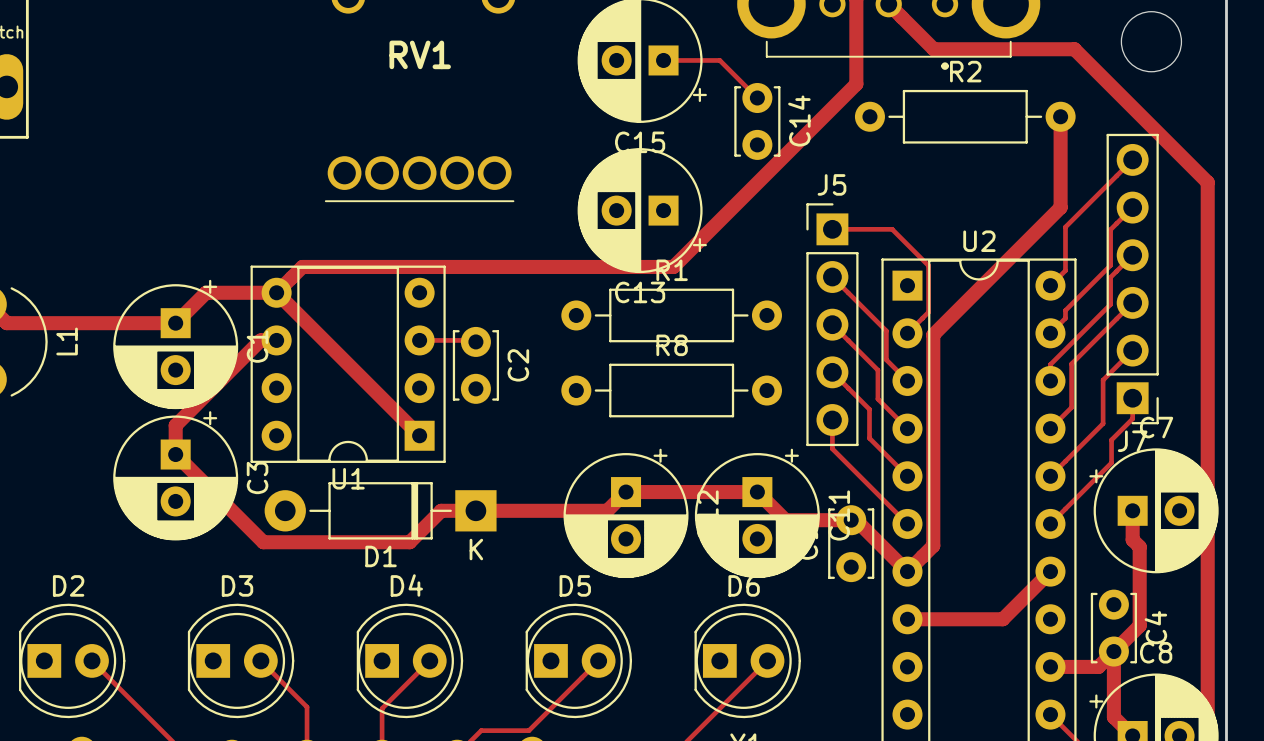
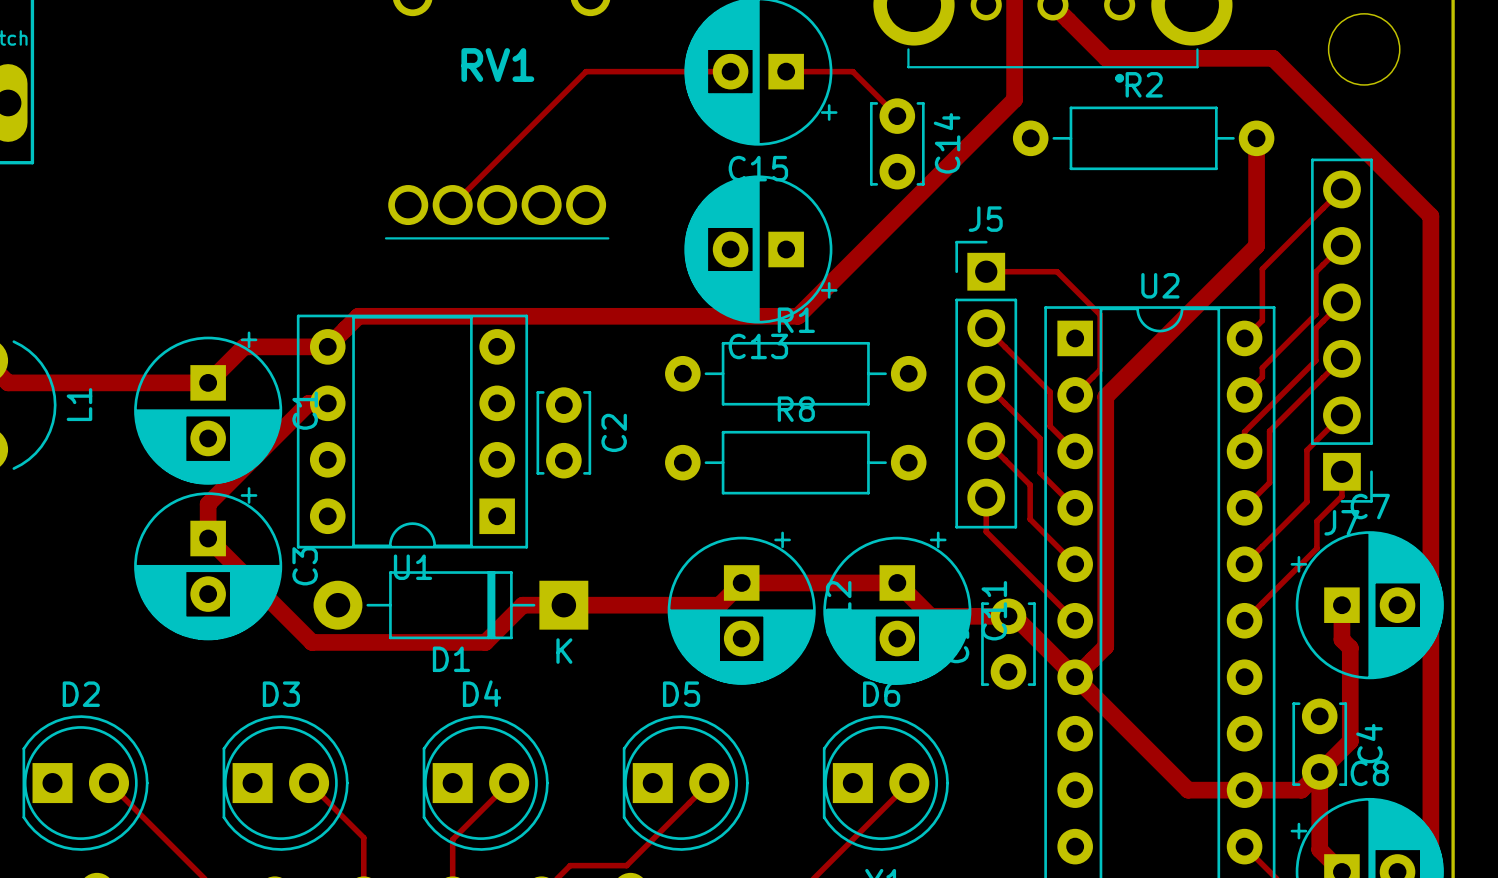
track: none -> (730, 71) (586, 71) (452, 205)
track: (276, 292) (419, 435) -> none
track: (419, 340) (475, 341) -> none
track: none -> (1075, 677) (1188, 790) (1244, 790)
track: (1050, 571) (1002, 619) (907, 619) -> none

